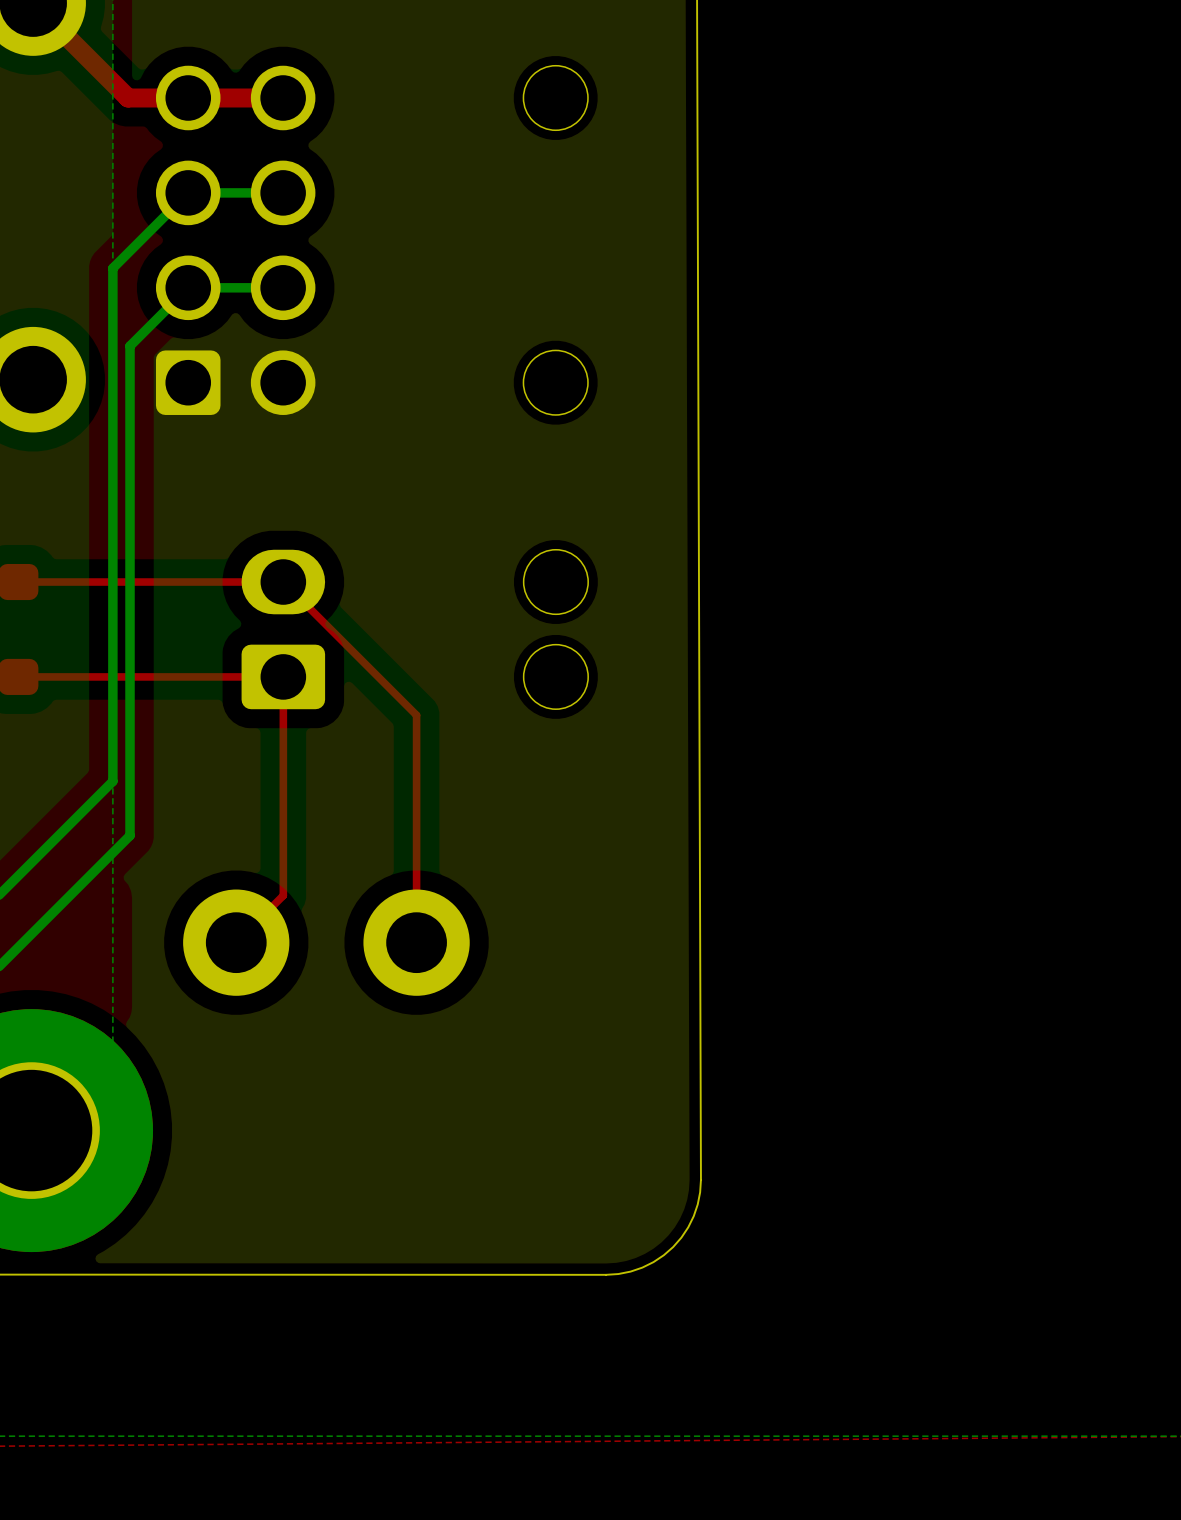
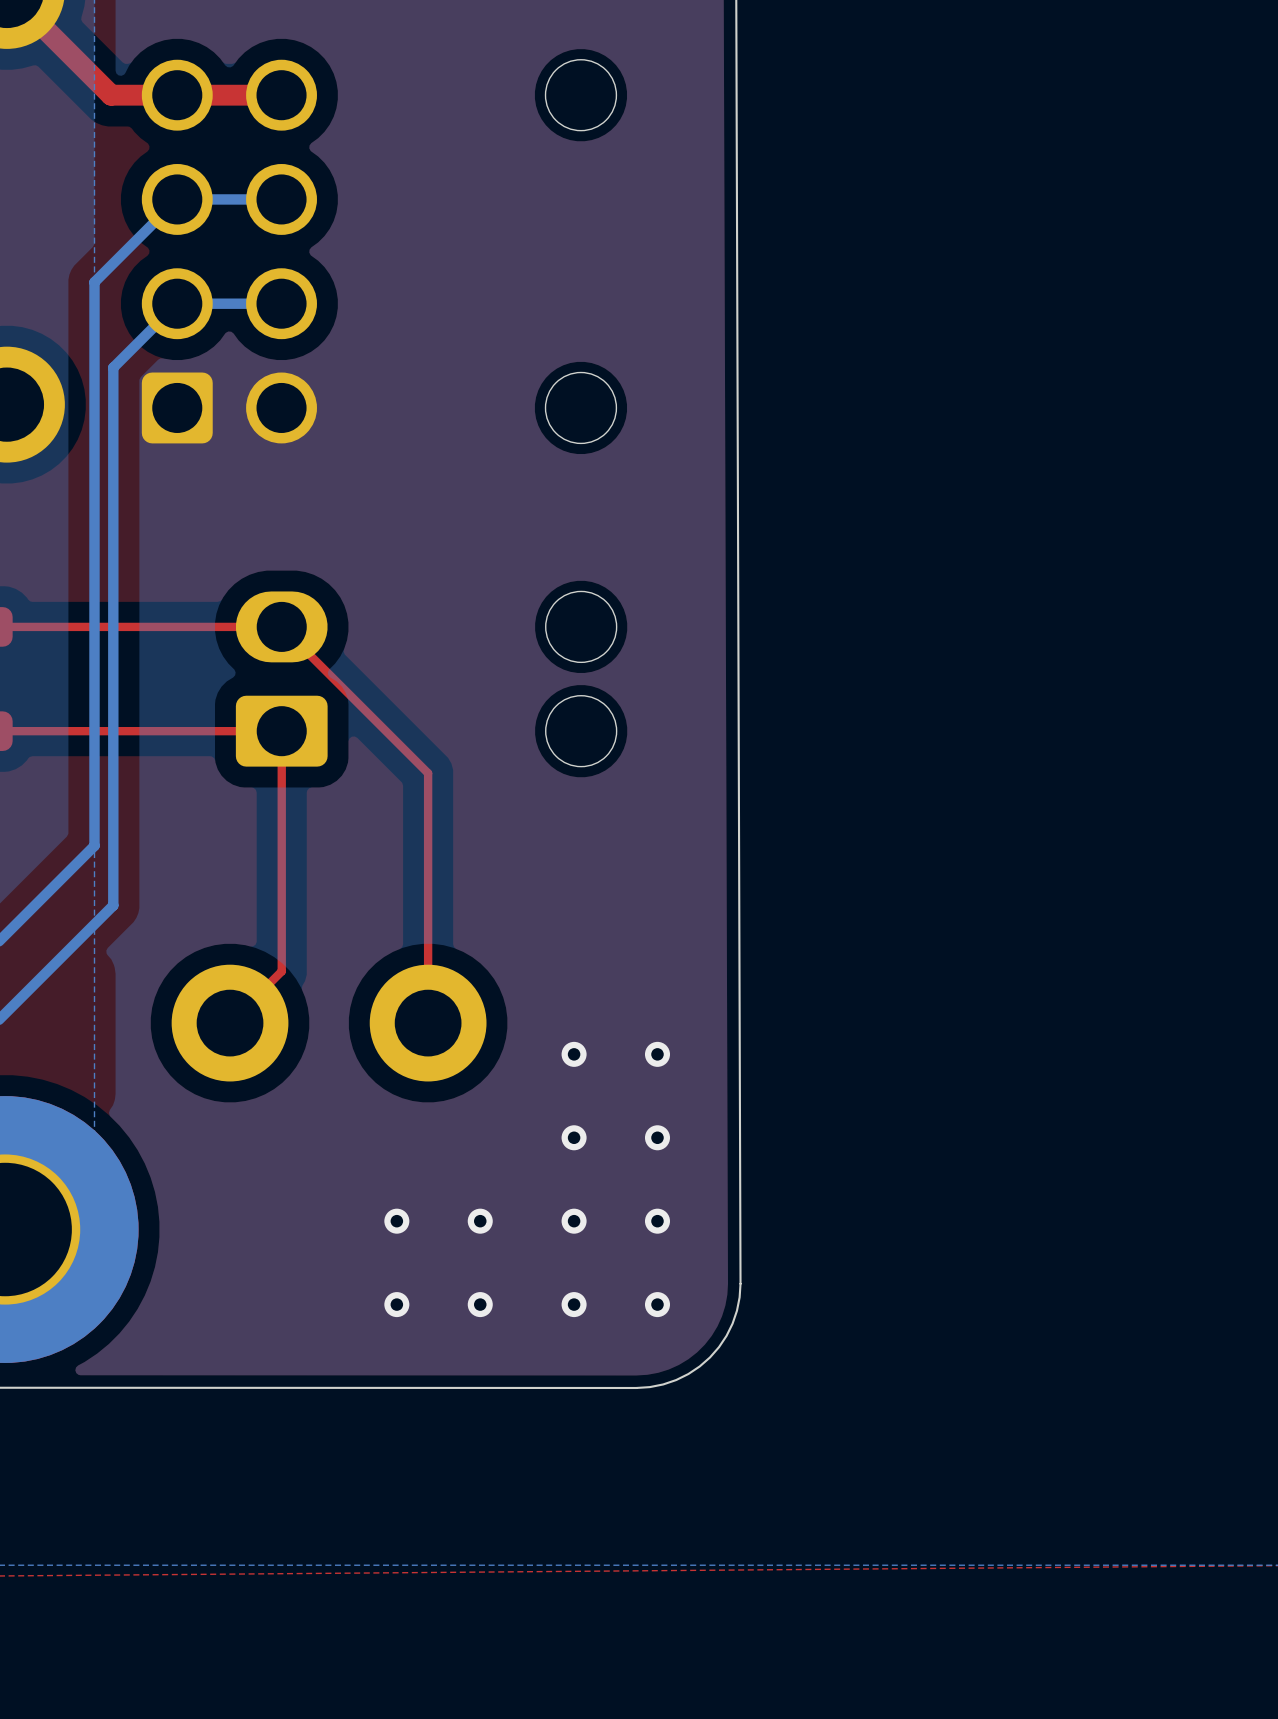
via: none -> (574, 1054)
via: none -> (657, 1054)
via: none -> (574, 1137)
via: none -> (657, 1137)
via: none -> (396, 1221)
via: none -> (480, 1221)
via: none -> (574, 1221)
via: none -> (657, 1221)
via: none -> (396, 1304)
via: none -> (480, 1304)
via: none -> (574, 1304)
via: none -> (657, 1304)

